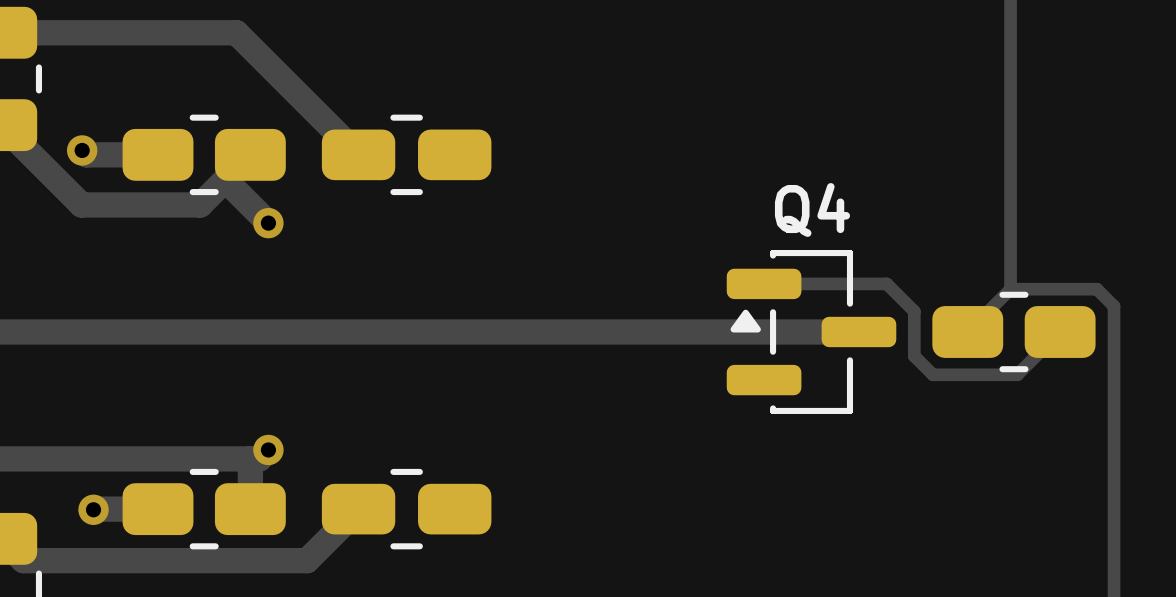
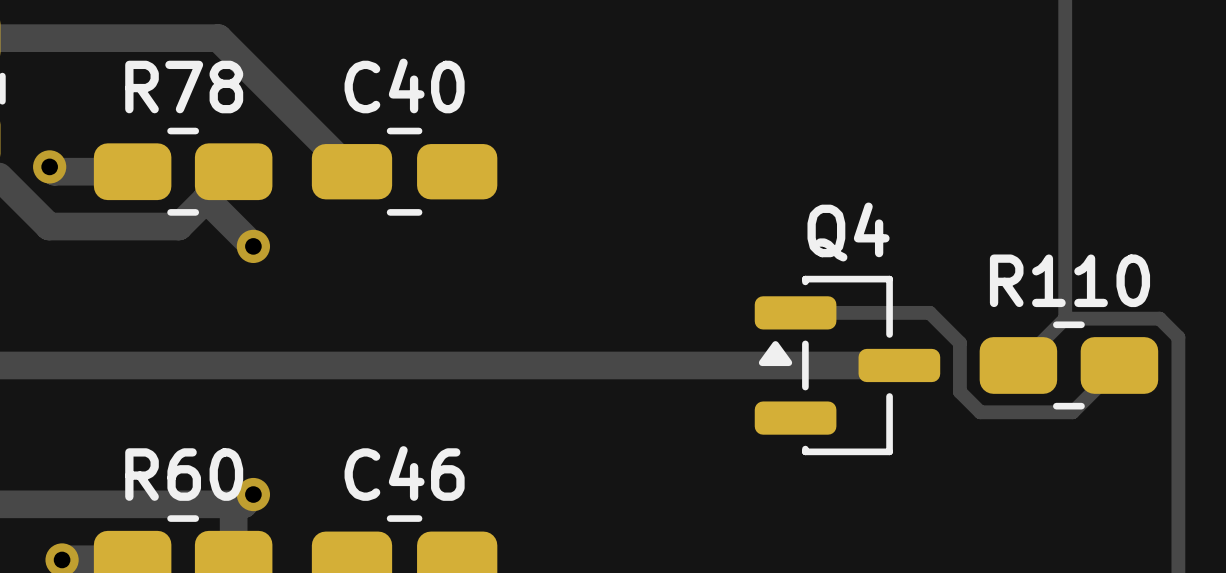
C40 name: none -> C40 (404, 85)
R78 name: none -> R78 (184, 87)
R110 name: none -> R110 (1069, 280)
C46 name: none -> C46 (404, 473)
R60 name: none -> R60 (184, 474)

